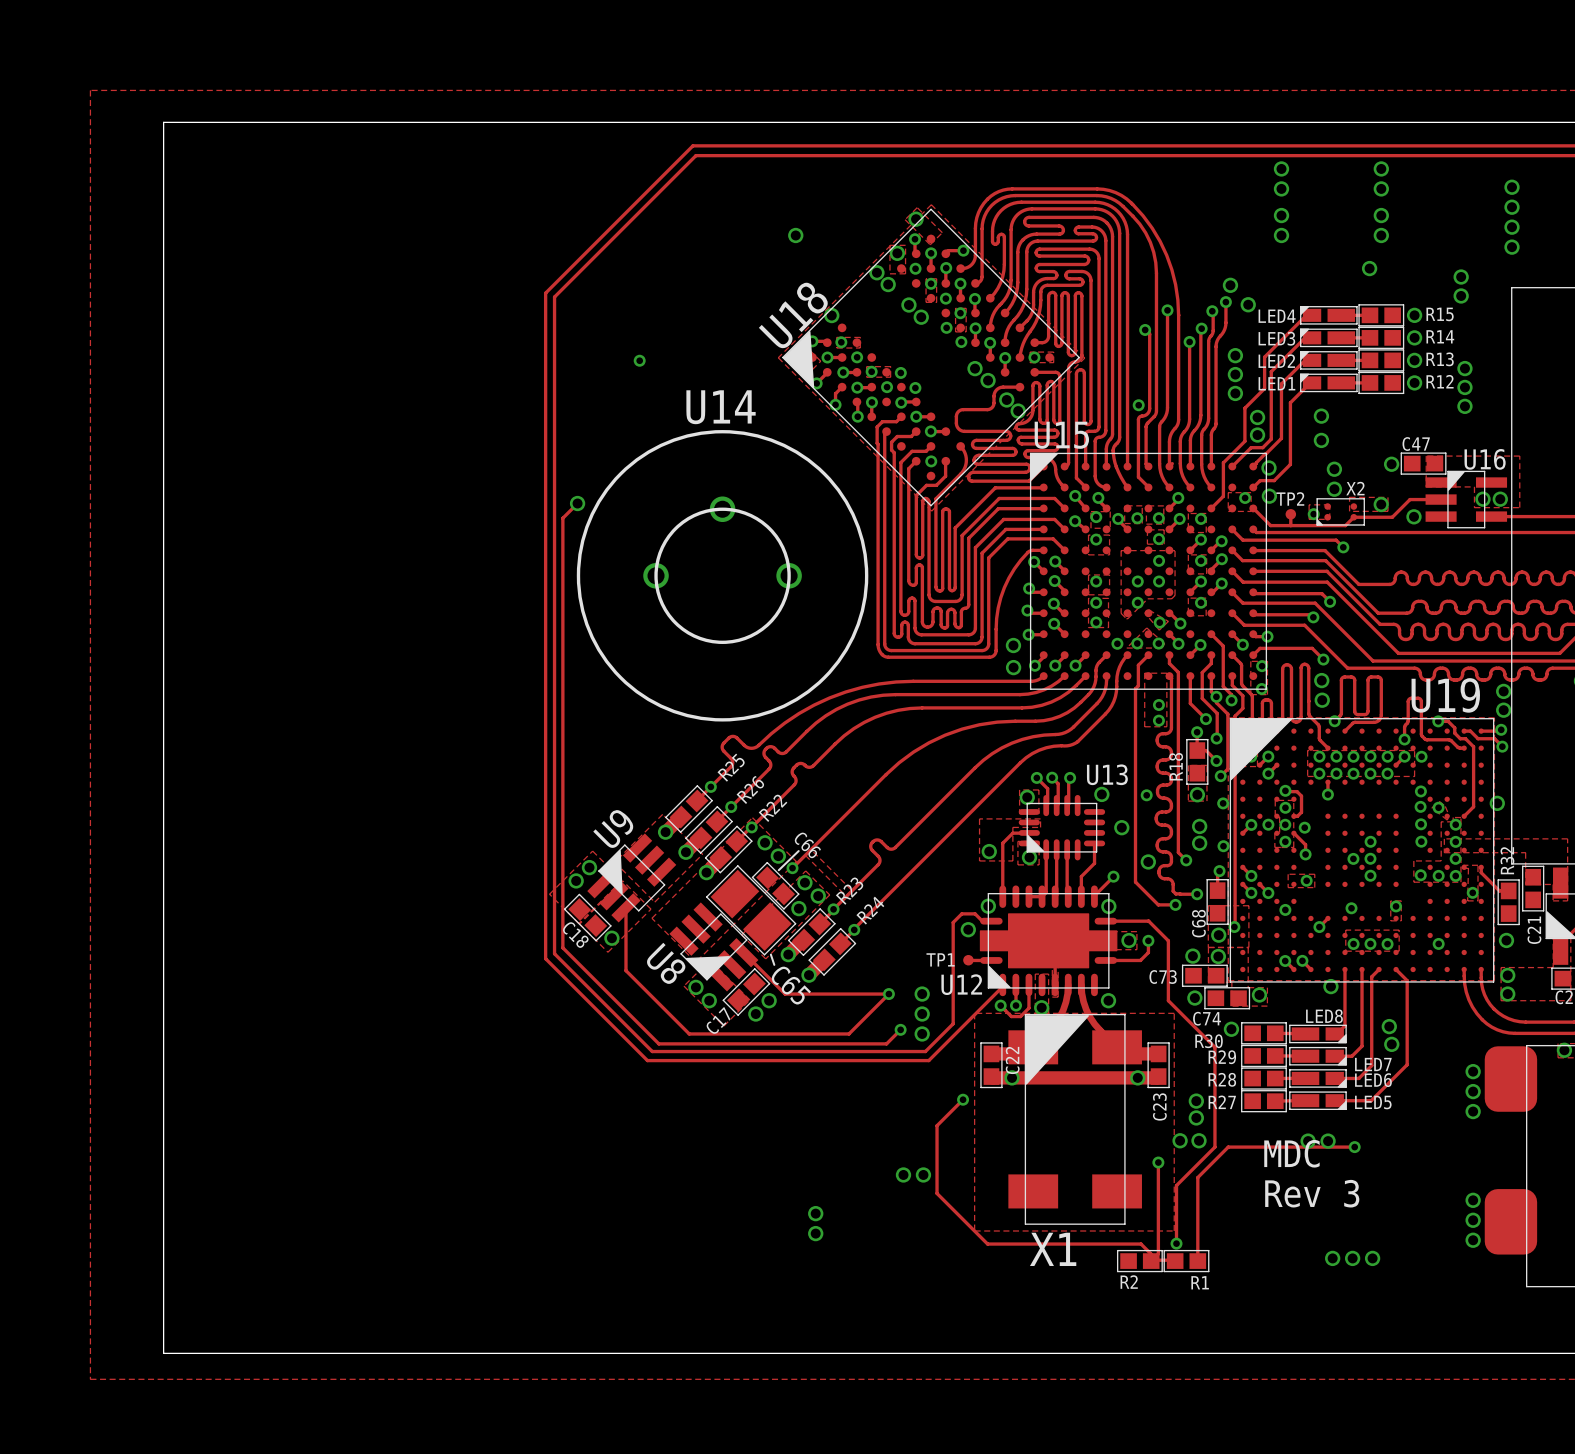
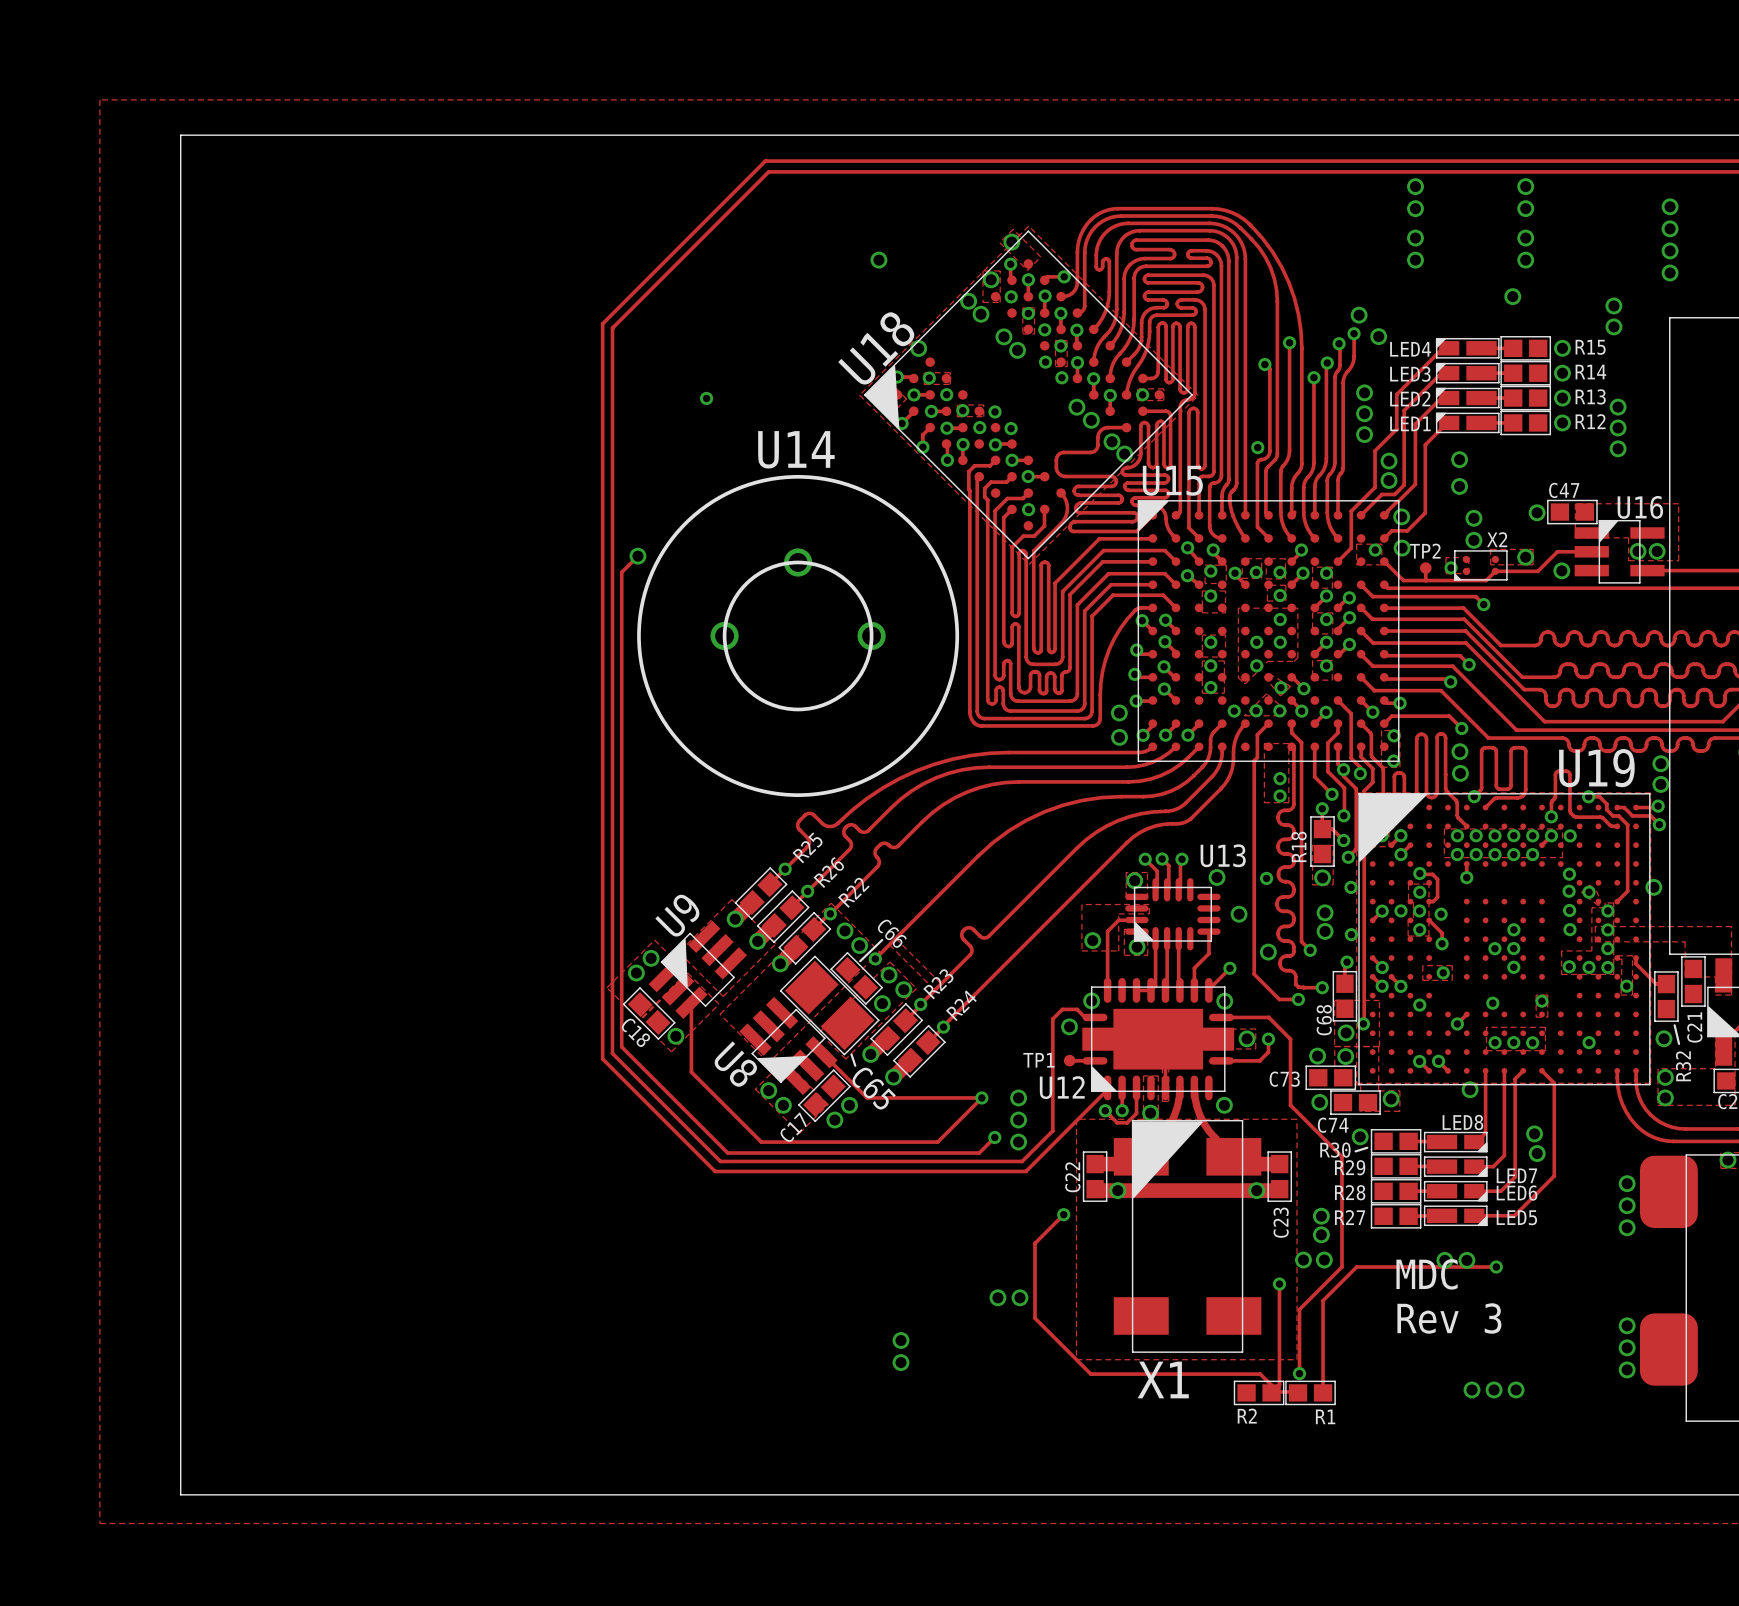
R32 name position: R32 (1507, 860) -> R32 (1683, 1066)
line: none -> (1674, 1025) (1679, 1043)
line: none -> (1367, 1147) (1355, 1151)
C22 name position: C22 (1012, 1060) -> C22 (1072, 1177)

